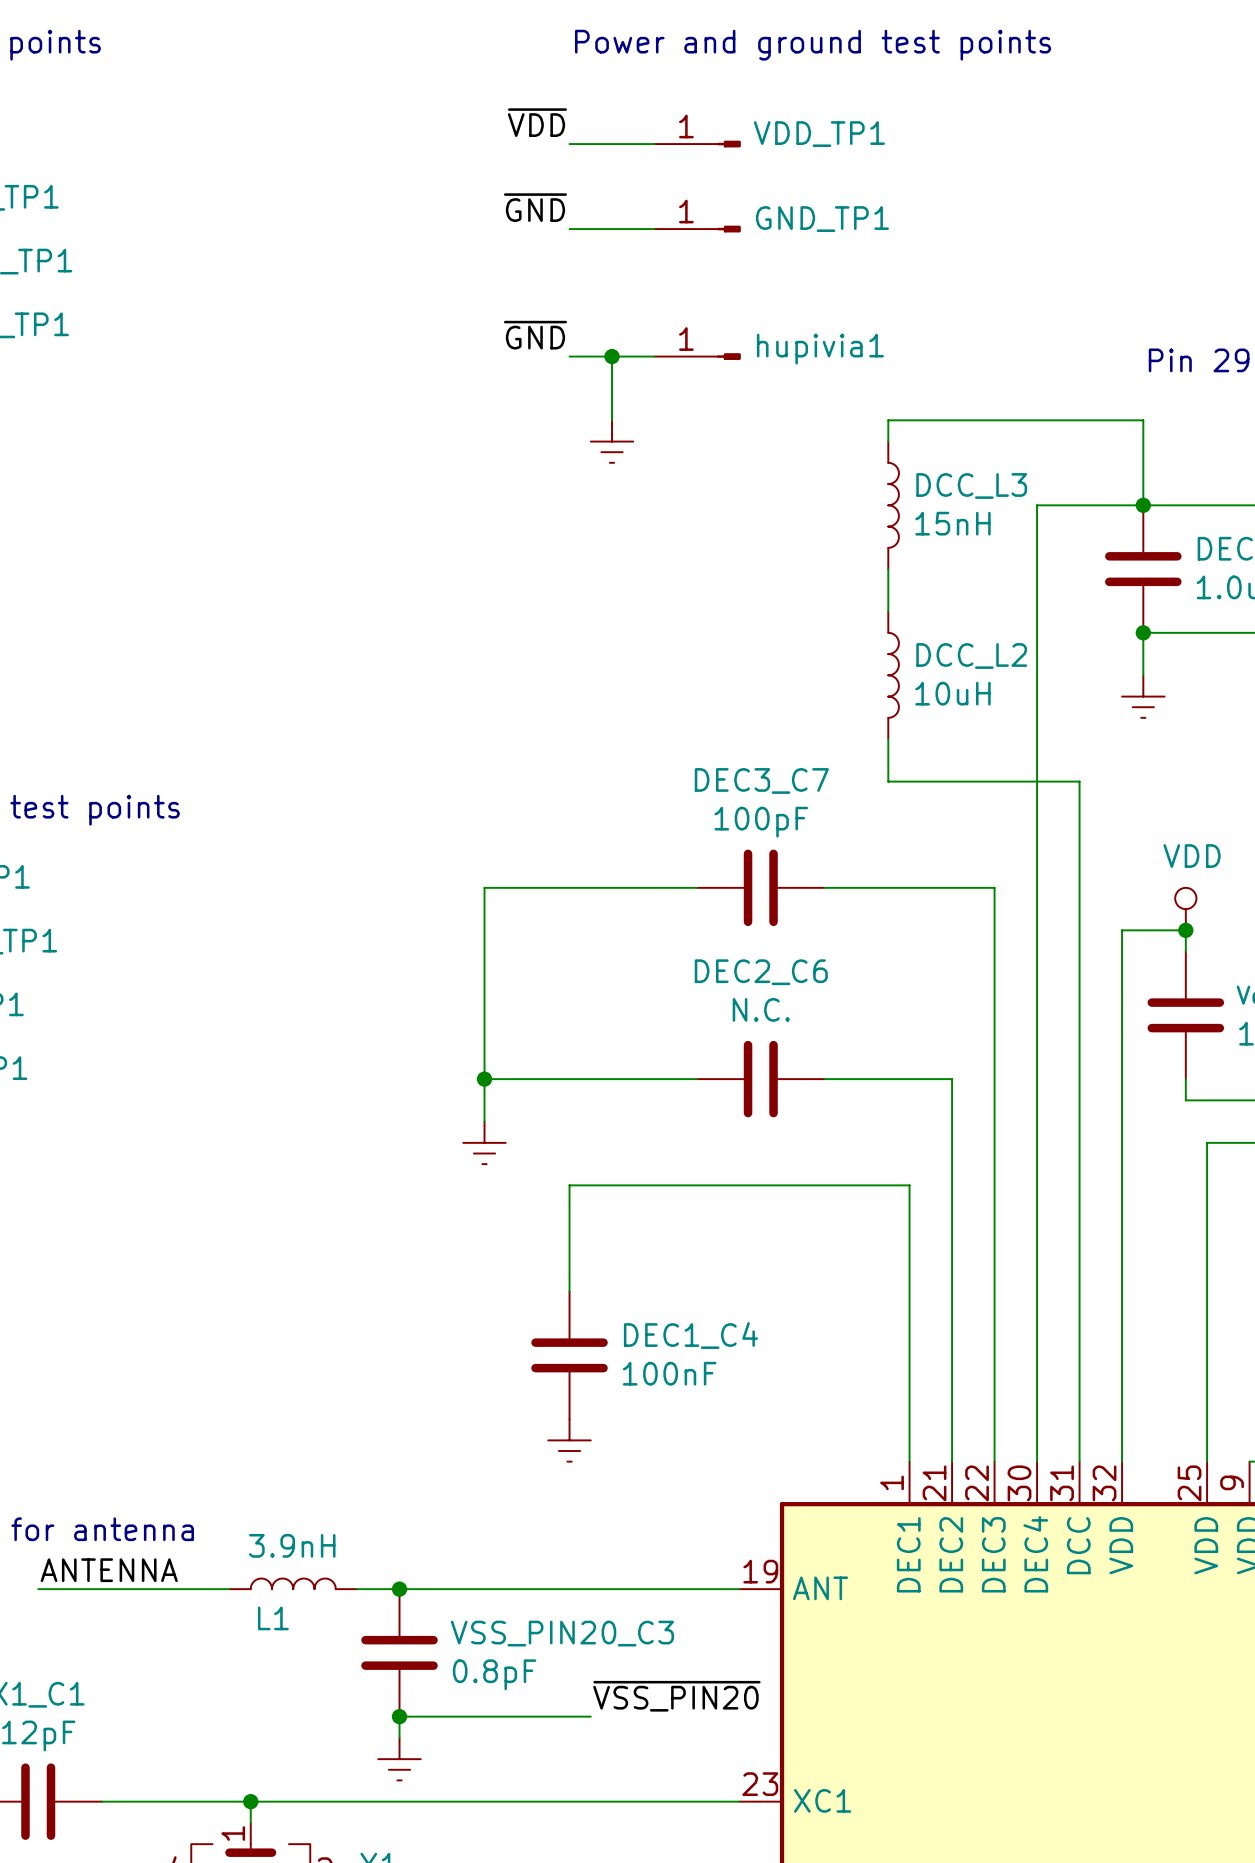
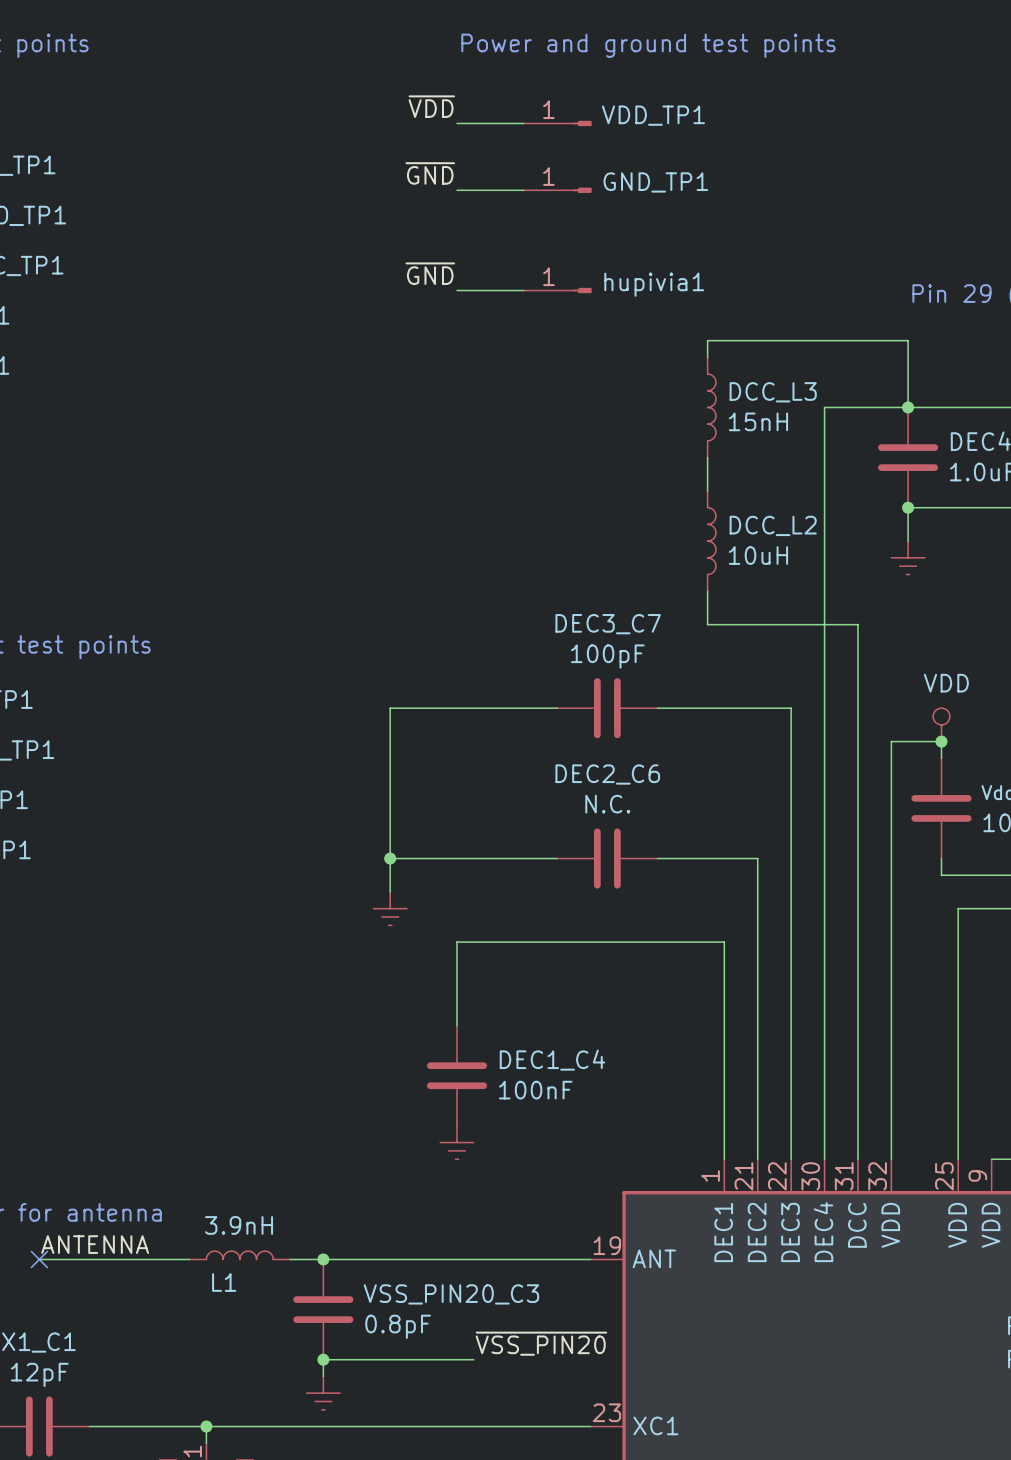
wire: (612, 356) (612, 420) -> none
junction: (612, 356) -> none
power symbol: (612, 441) -> none
no-connect mark: none -> (39, 1259)

